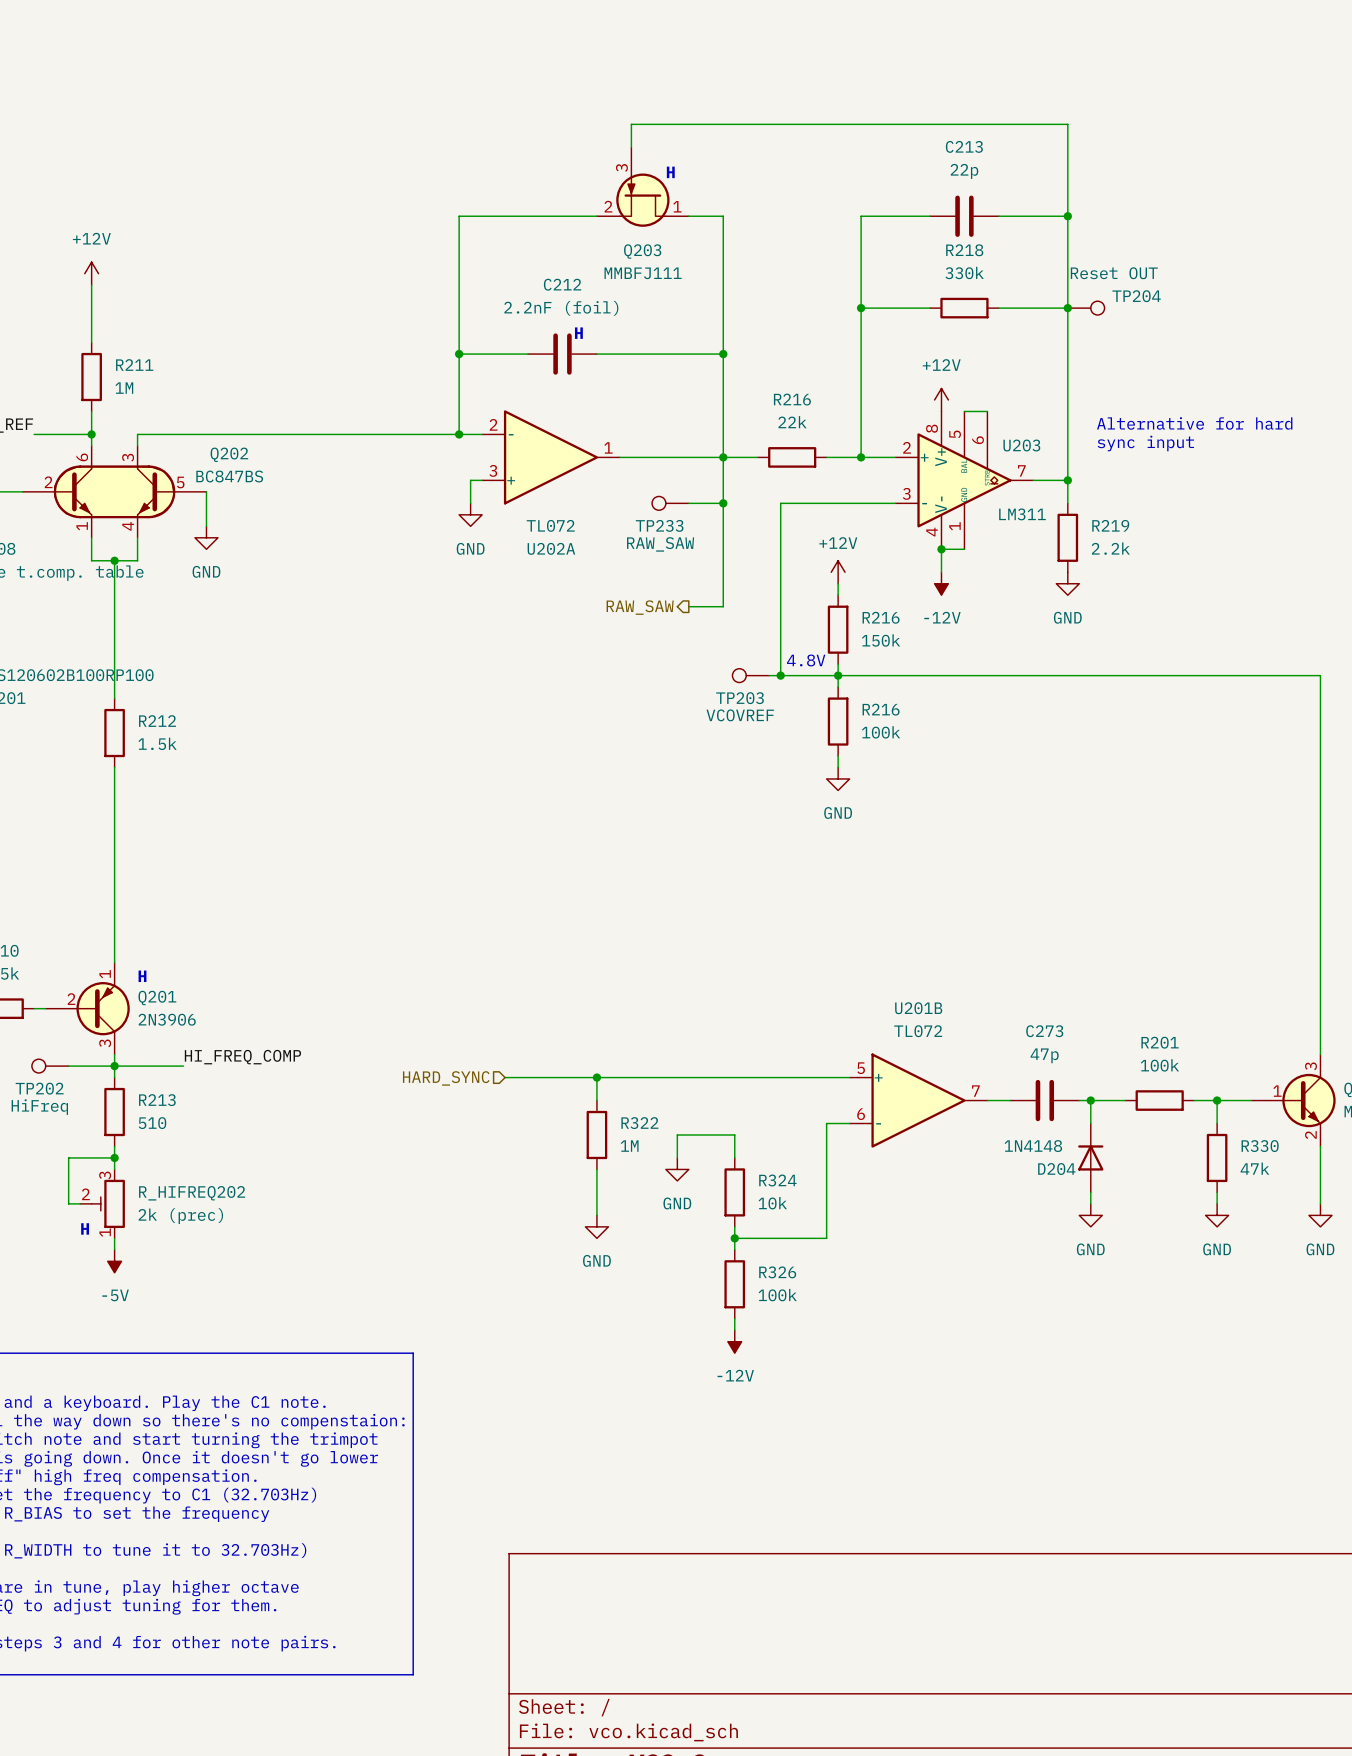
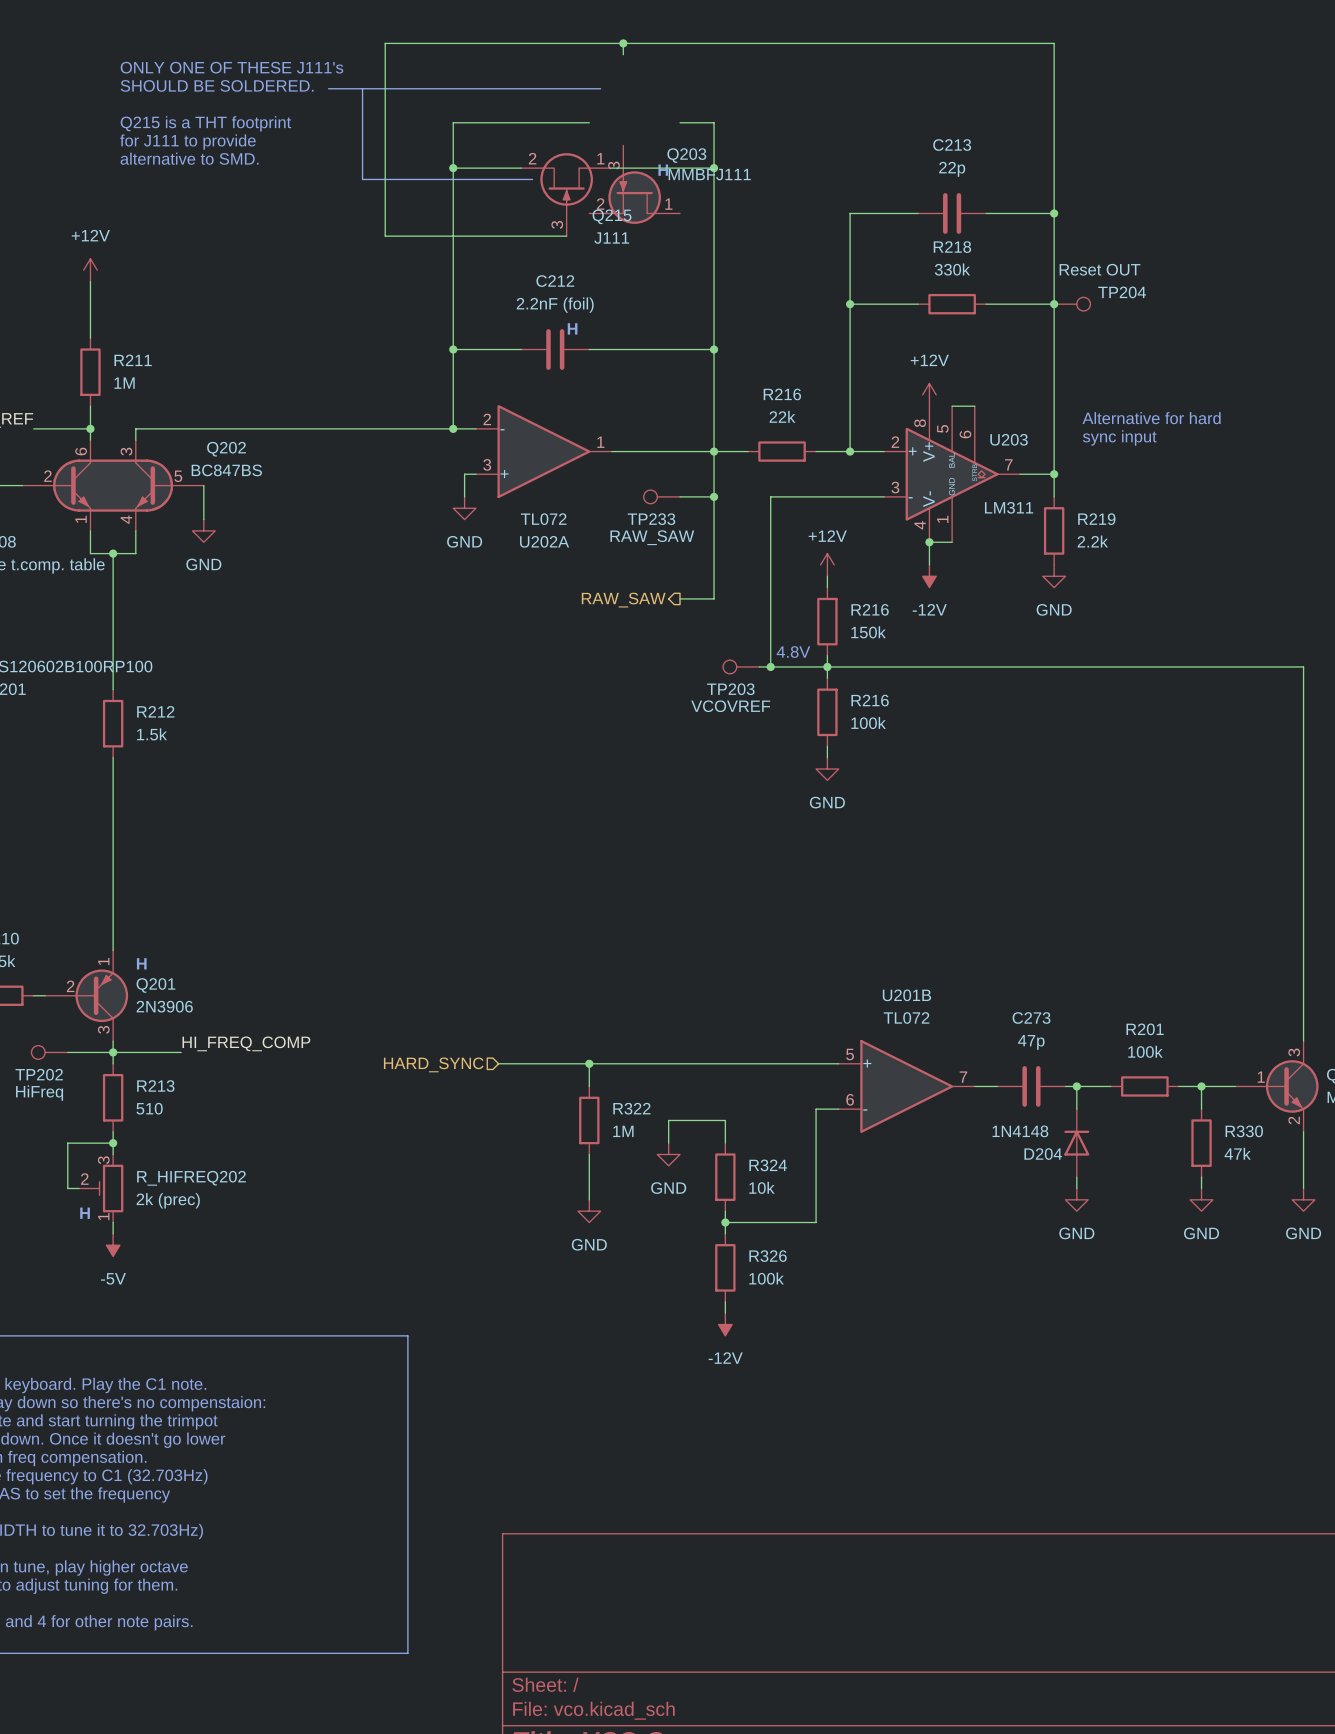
wire: none -> (623, 43) (623, 54)
junction: none -> (623, 43)
text: none -> ONLY ONE OF THESE J111's (231, 67)
text: none -> SHOULD BE SOLDERED. (217, 85)
line: none -> (328, 88) (600, 88)
line: none -> (362, 88) (362, 179) (532, 179)
wire: (688, 124) (631, 124) (631, 147) -> none
wire: (723, 124) (1067, 124) -> (566, 236) (385, 236) (385, 43) (1054, 43) (1054, 122)
text: none -> Q215 is a THT footprint (205, 123)
text: none -> for J111 to provide (187, 142)
text: none -> alternative to SMD. (189, 158)
wire: none -> (453, 168) (521, 168)
junction: none -> (453, 168)
wire: none -> (611, 168) (714, 168)
junction: none -> (714, 168)
Q215: none -> J111 (566, 194)
wire: (459, 216) (596, 216) -> (453, 213) (453, 122) (589, 122)
wire: (688, 216) (723, 216) -> (714, 122) (714, 213)
Q203 name position: Q203 (642, 251) -> Q203 (686, 155)
Q203 value position: MMBFJ111 (643, 273) -> MMBFJ111 (709, 174)

